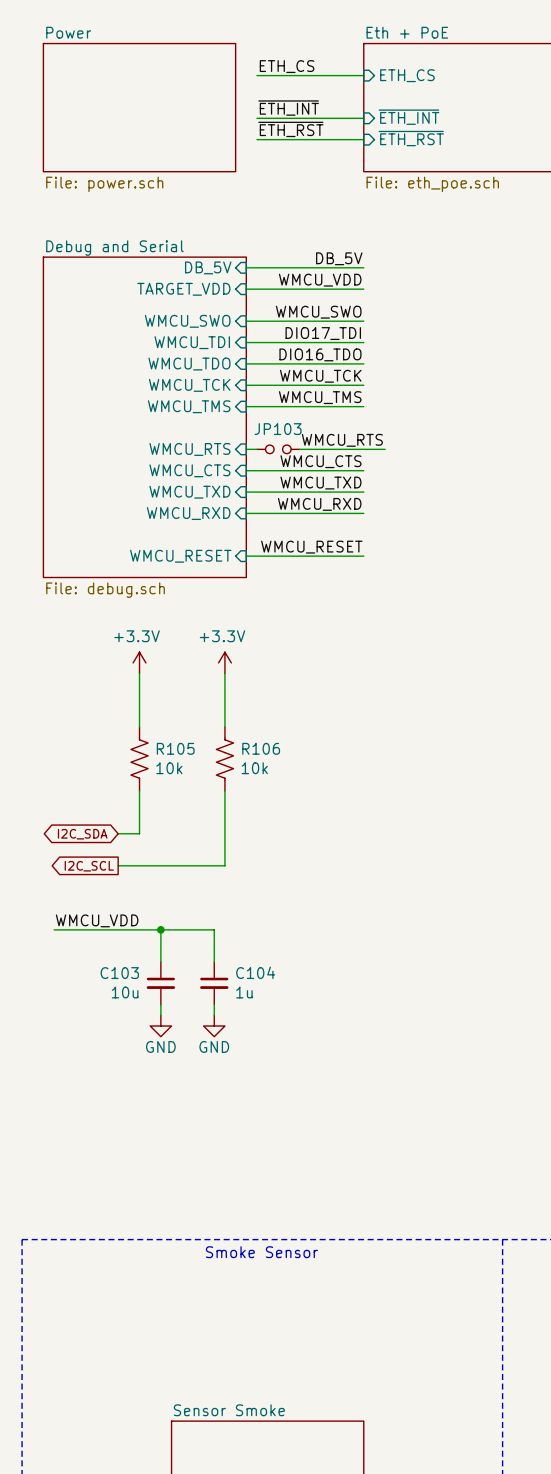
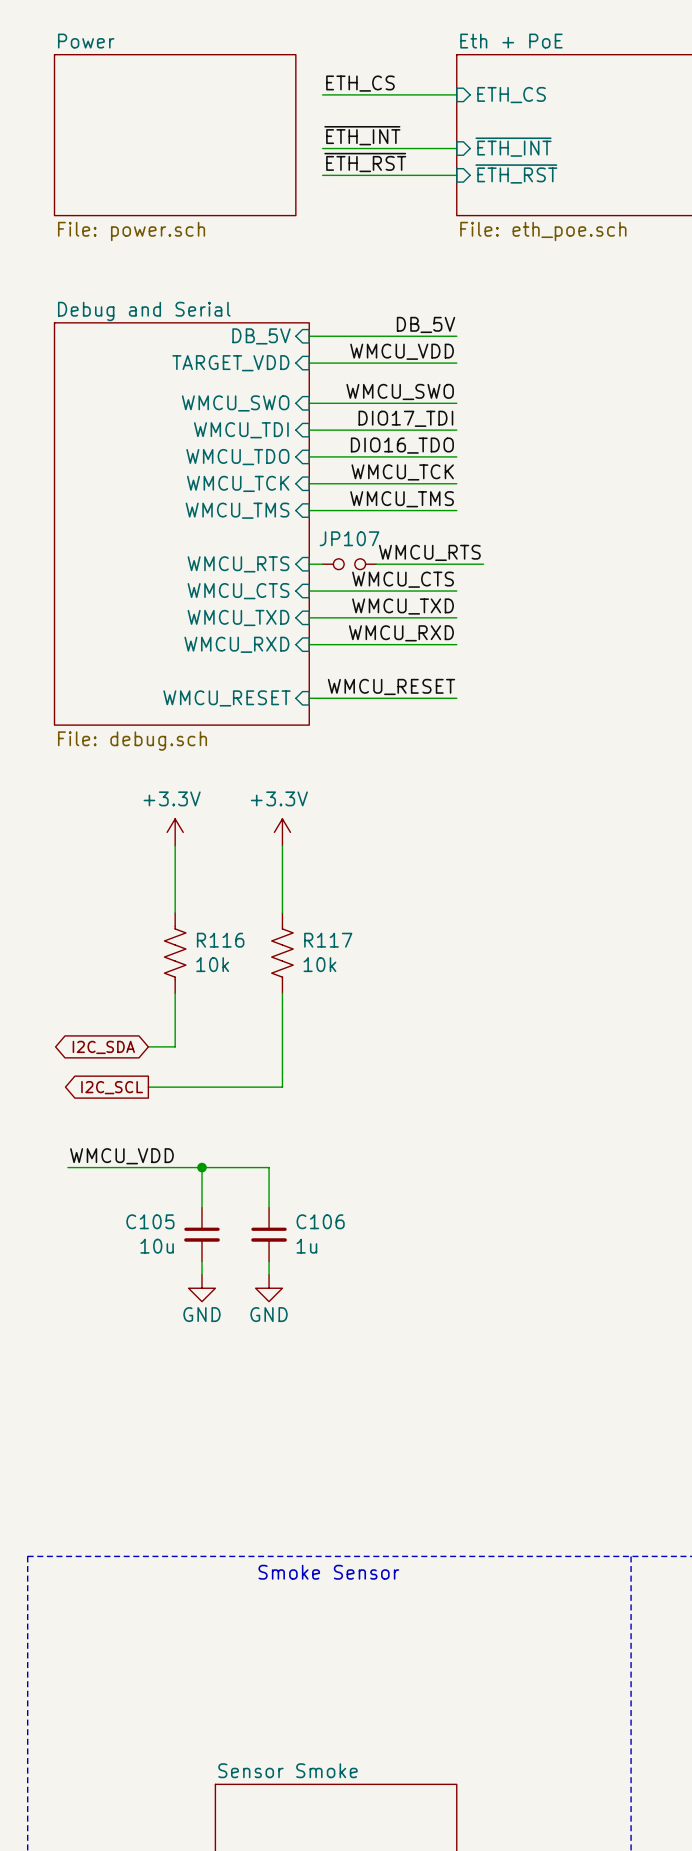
JP103 name: JP103 (278, 429) -> JP107 (349, 538)
R105 name: R105 (175, 748) -> R116 (220, 940)
R106 name: R106 (261, 748) -> R117 (328, 940)
C104 name: C104 (255, 972) -> C106 (320, 1221)
C103 name: C103 (119, 973) -> C105 (150, 1221)

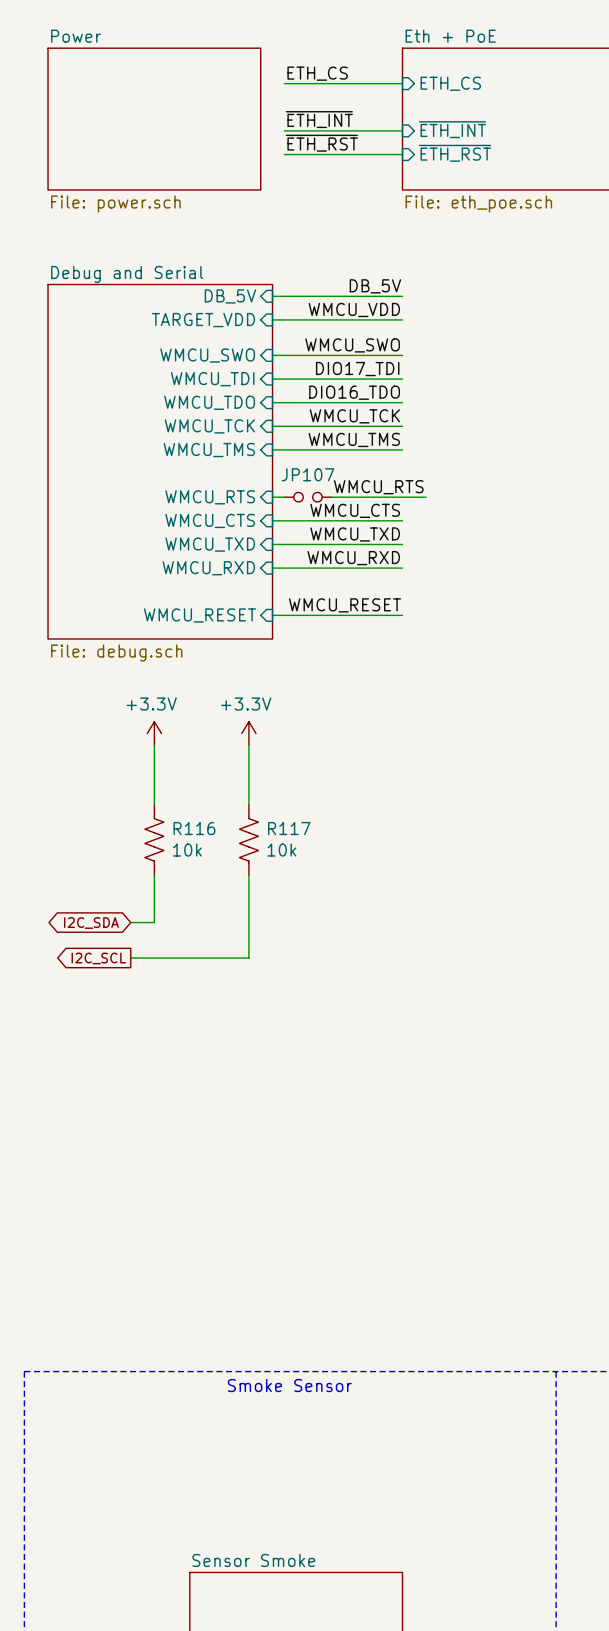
label: WMCU_VDD (121, 1156) -> none
wire: (67, 1167) (269, 1167) (269, 1207) -> none
wire: (201, 1167) (201, 1207) -> none
junction: (201, 1167) -> none
C105: 10u (201, 1234) -> none
C106: 1u (269, 1234) -> none
wire: (201, 1261) (201, 1274) -> none
wire: (269, 1261) (269, 1274) -> none
power symbol: GND (201, 1288) -> none
power symbol: GND (269, 1288) -> none

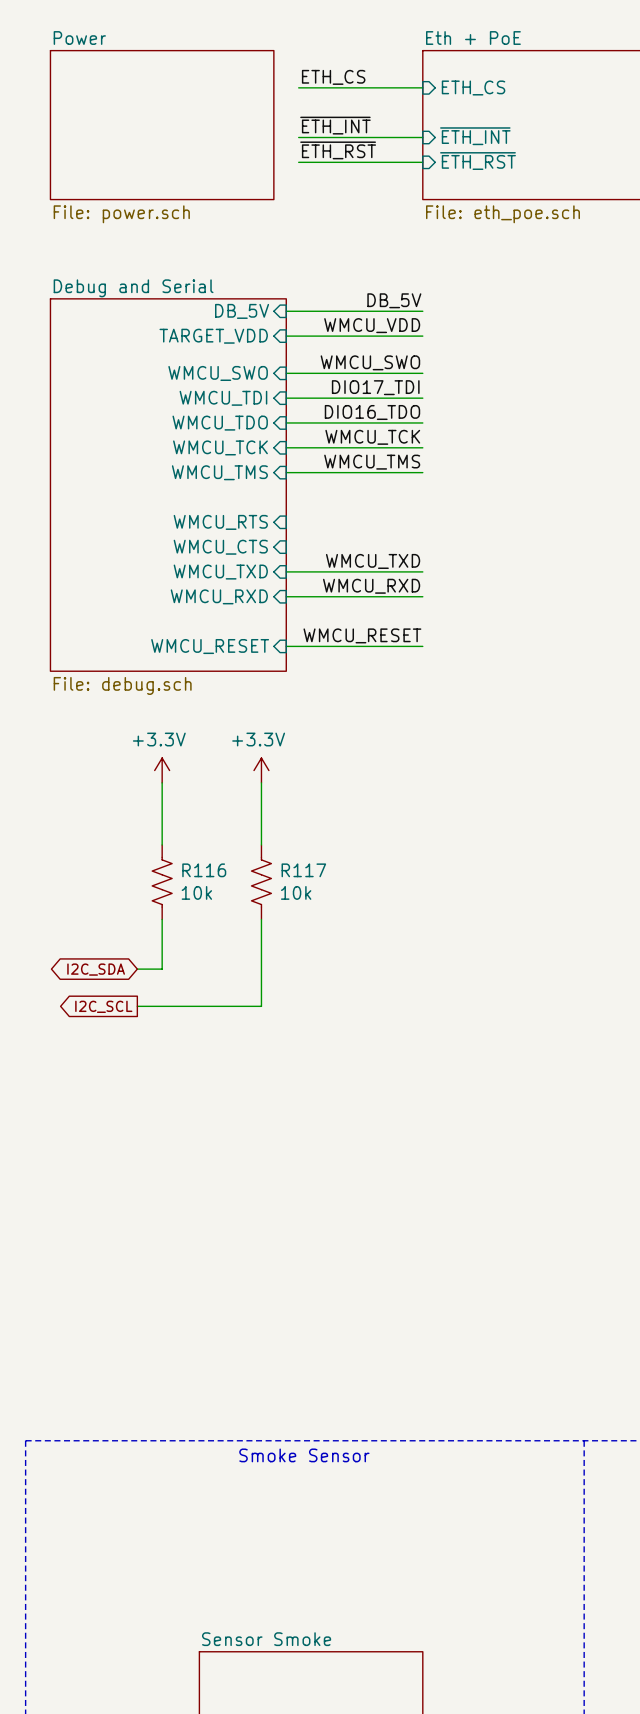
label: WMCU_RTS (378, 487) -> none
wire: (272, 497) (284, 497) -> none
JP107: (307, 497) -> none
wire: (331, 497) (426, 497) -> none
label: WMCU_CTS (355, 510) -> none
wire: (272, 520) (402, 520) -> none

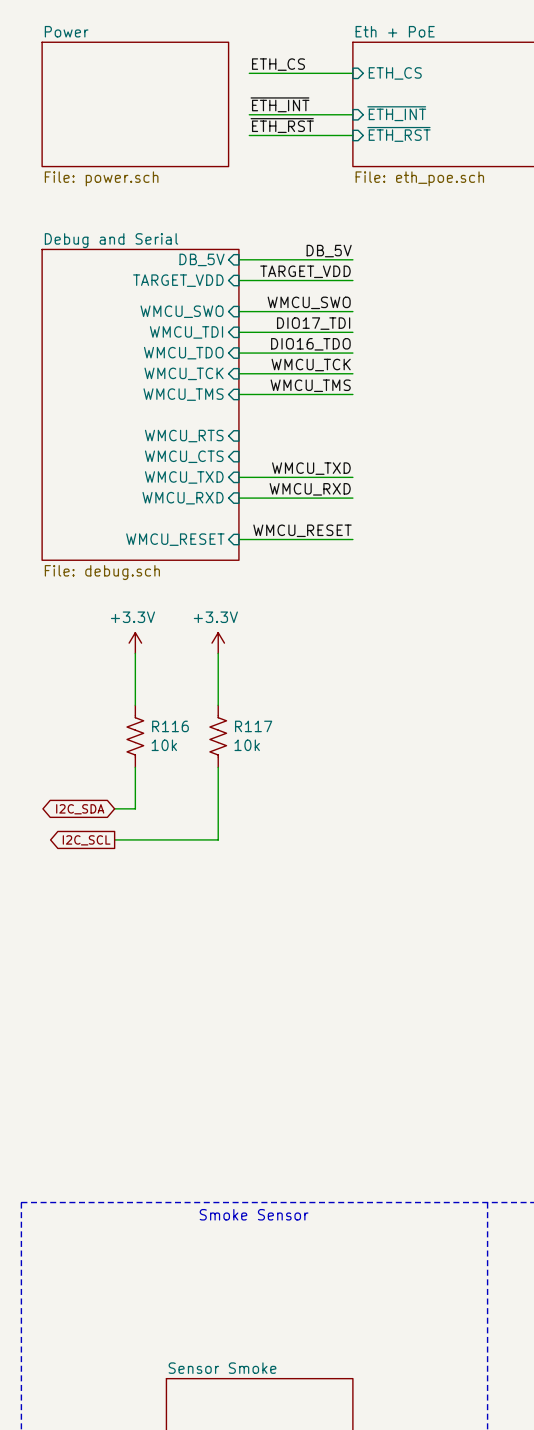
label: WMCU_VDD (372, 325) -> TARGET_VDD (305, 271)

